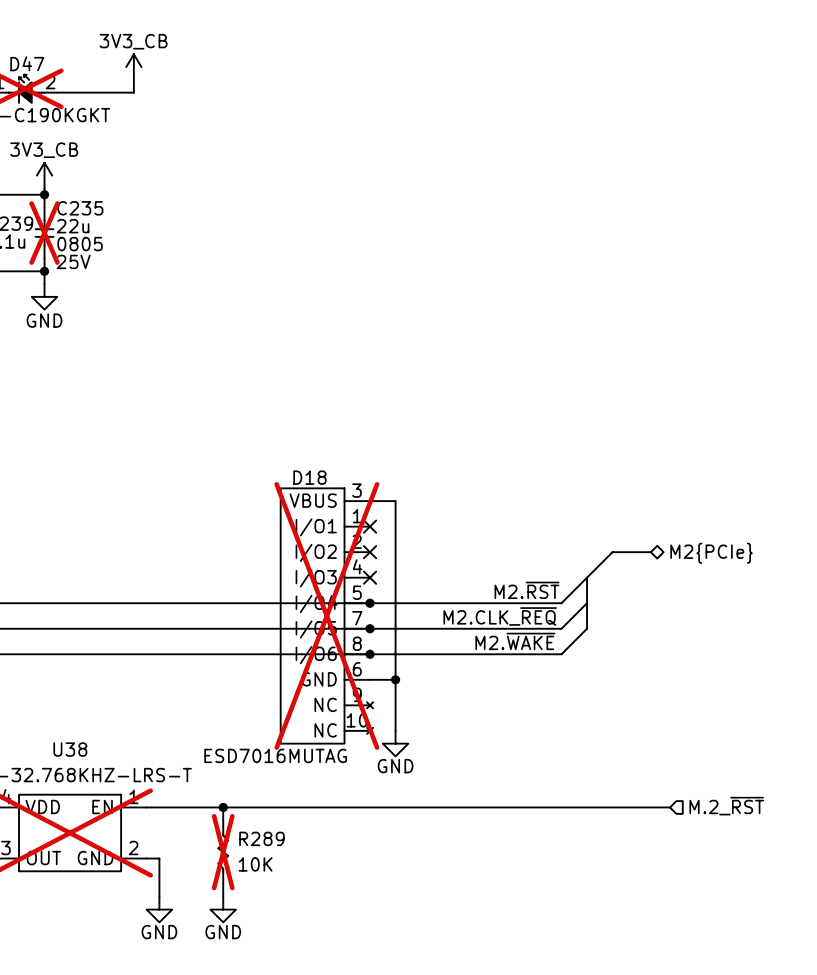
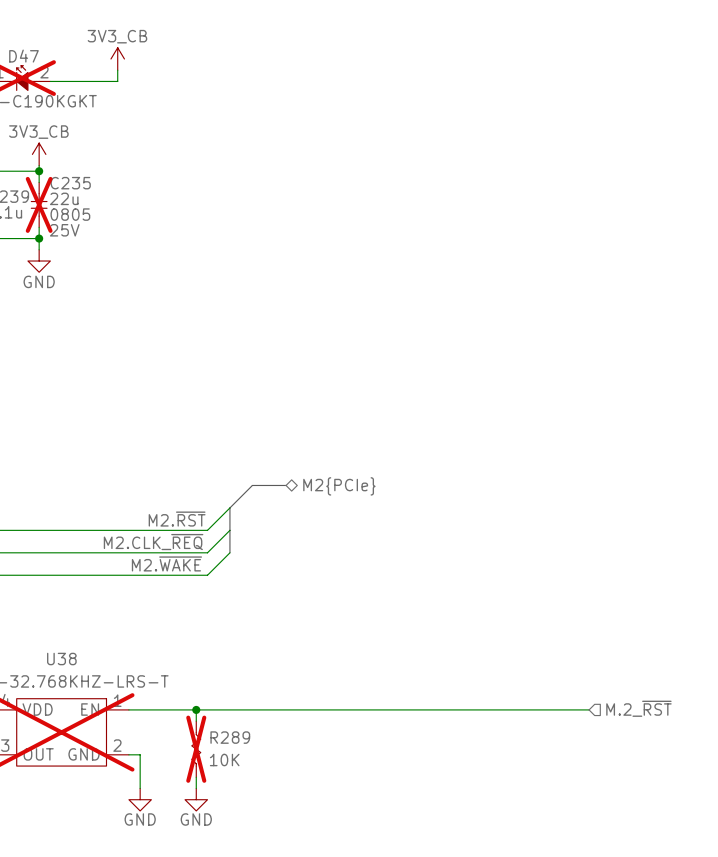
wire: (370, 501) (395, 501) (395, 730) -> none
no-connect mark: (370, 526) -> none
bus: none -> (286, 485) (252, 485) (229, 507) (229, 552)
no-connect mark: (370, 552) -> none
bus: (650, 552) (612, 552) (587, 577) (587, 628) -> none
hierarchical label: none -> M2{PCIe} (339, 486)
hierarchical label: M2{PCIe} (711, 553) -> none
no-connect mark: (370, 577) -> none
wire: (587, 577) (561, 603) (236, 603) -> (229, 507) (207, 530)
label: none -> M2.~{RST} (177, 519)
label: M2.~{RST} (526, 590) -> none
junction: (370, 603) -> none
wire: (587, 603) (561, 628) (236, 628) -> (229, 530) (207, 552)
D18: ESD7016MUTAG (326, 615) -> none
label: none -> M2.CLK_~{REQ} (153, 542)
label: M2.CLK_~{REQ} (500, 616) -> none
junction: (370, 628) -> none
wire: (587, 628) (561, 654) (236, 654) -> (229, 552) (207, 575)
label: none -> M2.~{WAKE} (166, 563)
label: M2.~{WAKE} (515, 641) -> none
junction: (370, 654) -> none
wire: (370, 679) (395, 679) -> none
junction: (395, 679) -> none
power symbol: GND (395, 743) -> none

